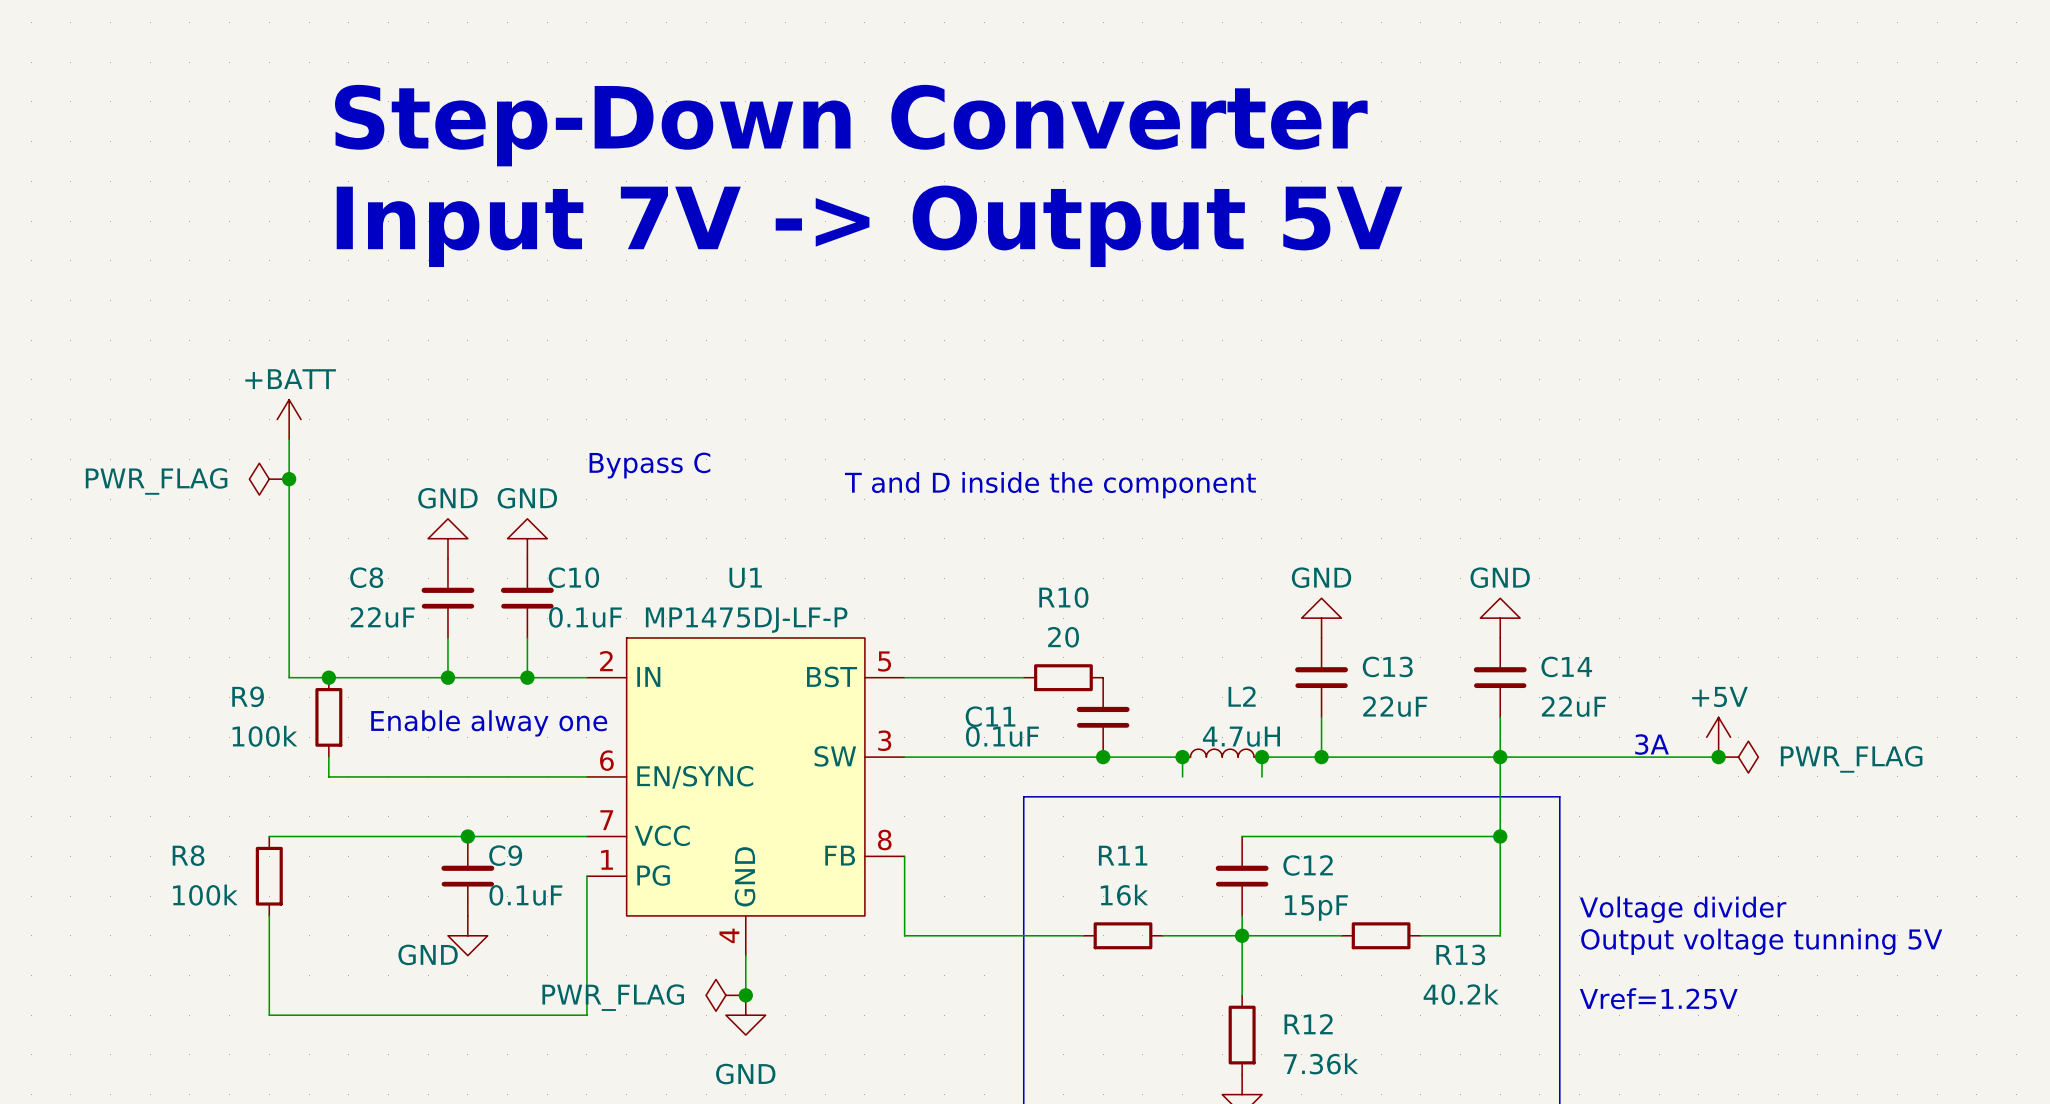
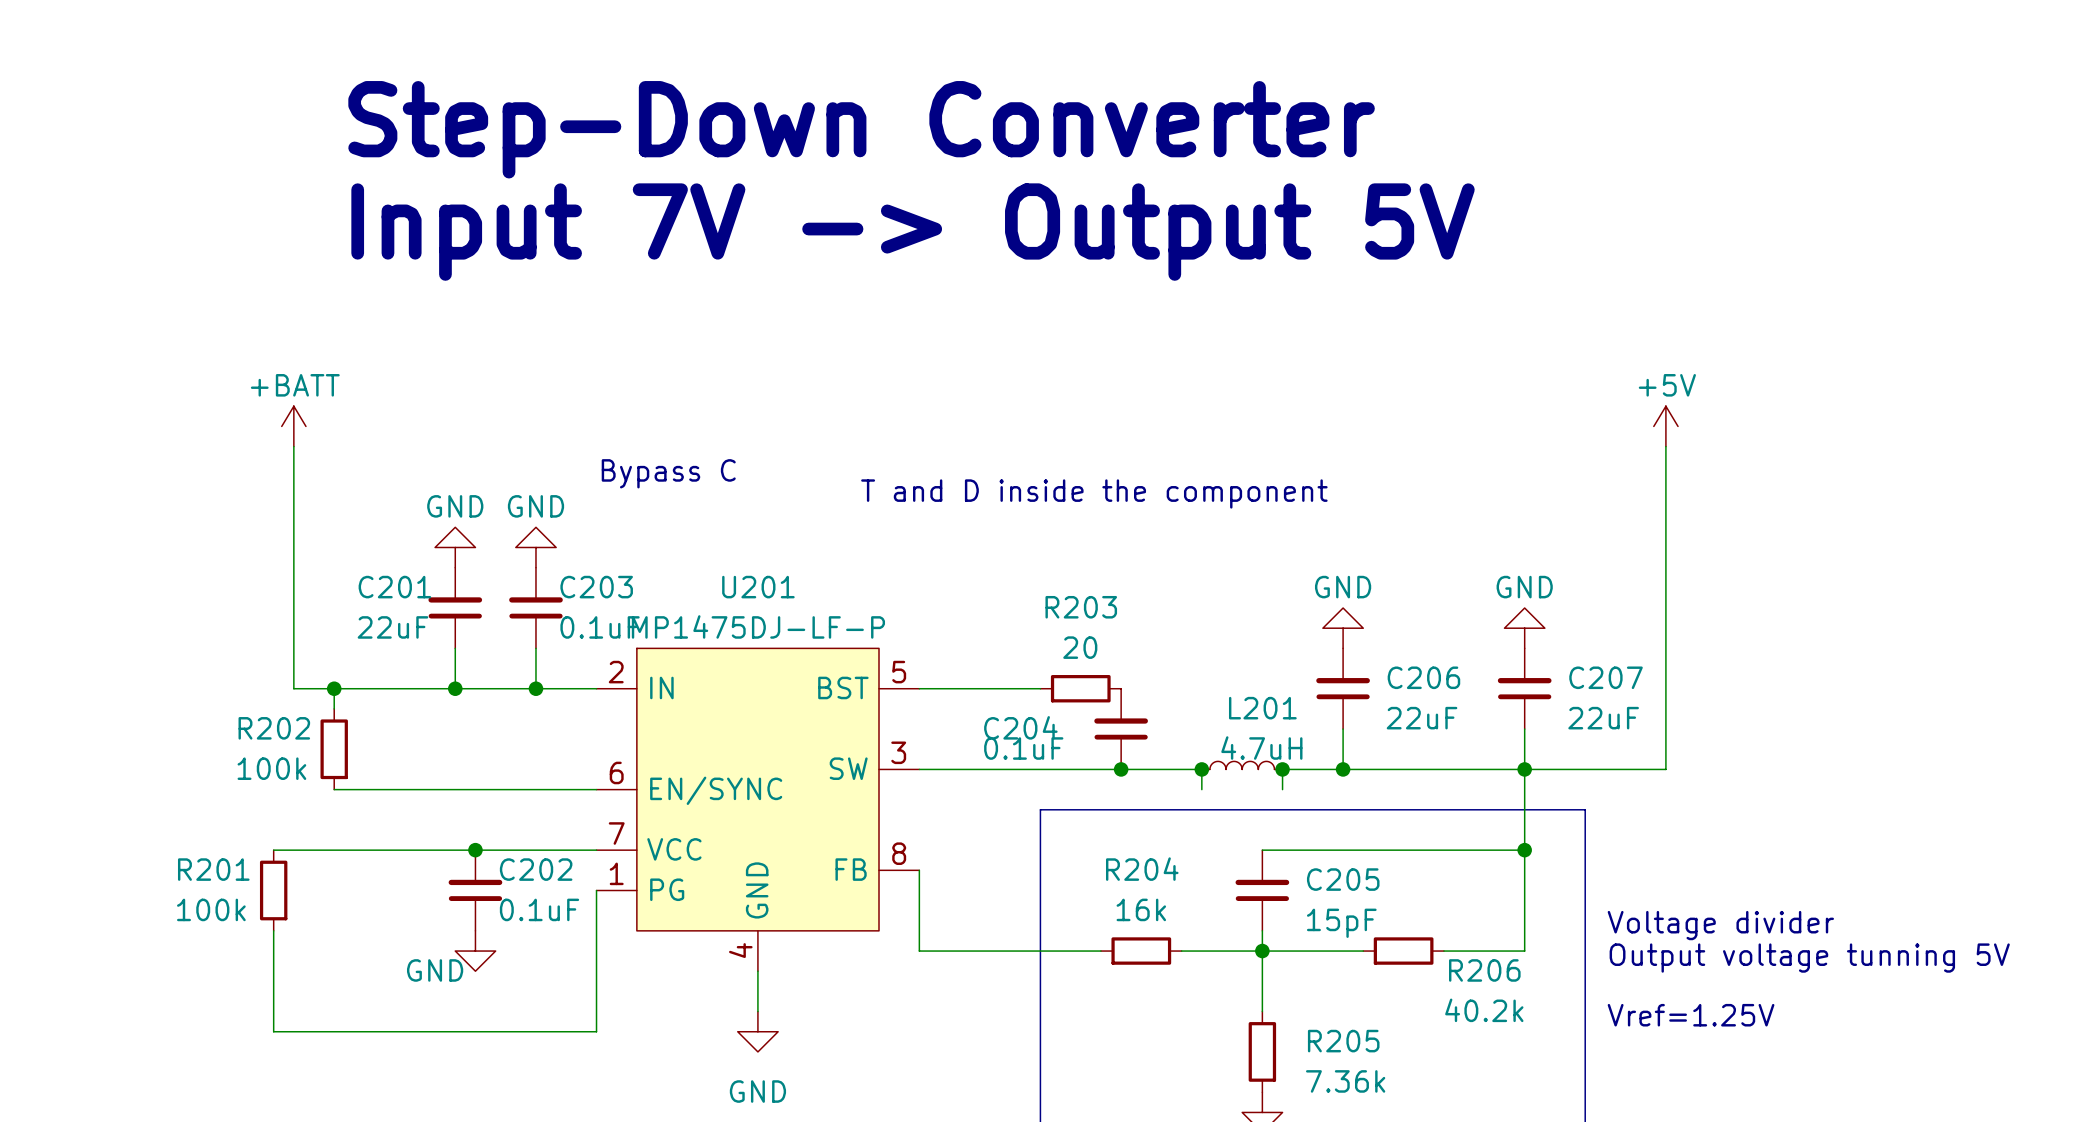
power symbol: PWR_FLAG (269, 479) -> none
junction: (289, 479) -> none
C8 name: C8 (366, 577) -> C201 (394, 587)
C10 name: C10 (573, 577) -> C203 (596, 587)
U1 name: U1 (745, 577) -> U201 (758, 587)
R10 name: R10 (1063, 597) -> R203 (1081, 607)
C13 name: C13 (1387, 666) -> C206 (1423, 677)
C14 name: C14 (1566, 666) -> C207 (1606, 677)
L2 name: L2 (1242, 696) -> L201 (1262, 708)
C11 name: C11 (990, 716) -> C204 (1020, 727)
R9: 100k (328, 717) -> none
text: Enable alway one (489, 723) -> none
R202: none -> 100k (334, 749)
power symbol position: +5V (1718, 737) -> +5V (1665, 426)
text: 3A (1652, 744) -> none
wire: (1639, 757) (1718, 757) -> (1665, 769) (1665, 446)
junction: (1718, 757) -> none
power symbol: PWR_FLAG (1738, 757) -> none
R8 name: R8 (188, 855) -> R201 (213, 869)
C9 name: C9 (505, 855) -> C202 (536, 869)
R11 name: R11 (1123, 855) -> R204 (1142, 869)
C12 name: C12 (1308, 865) -> C205 (1343, 879)
R13 name: R13 (1460, 954) -> R206 (1484, 970)
power symbol: PWR_FLAG (725, 995) -> none
junction: (745, 995) -> none
R12 name: R12 (1308, 1024) -> R205 (1343, 1041)

